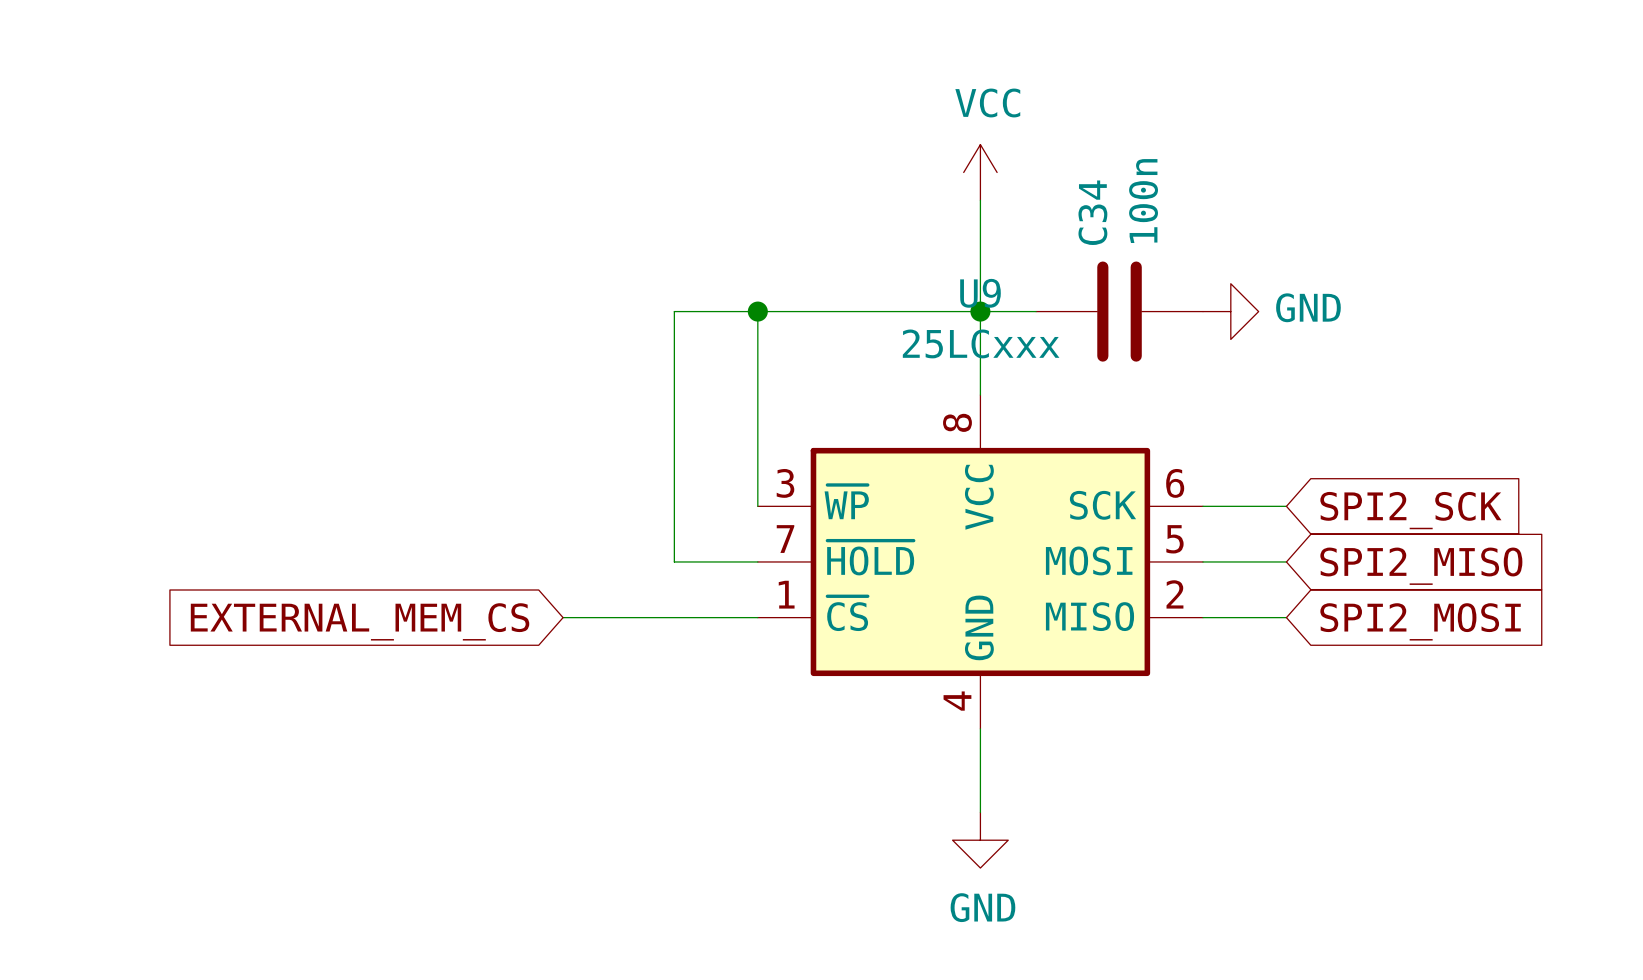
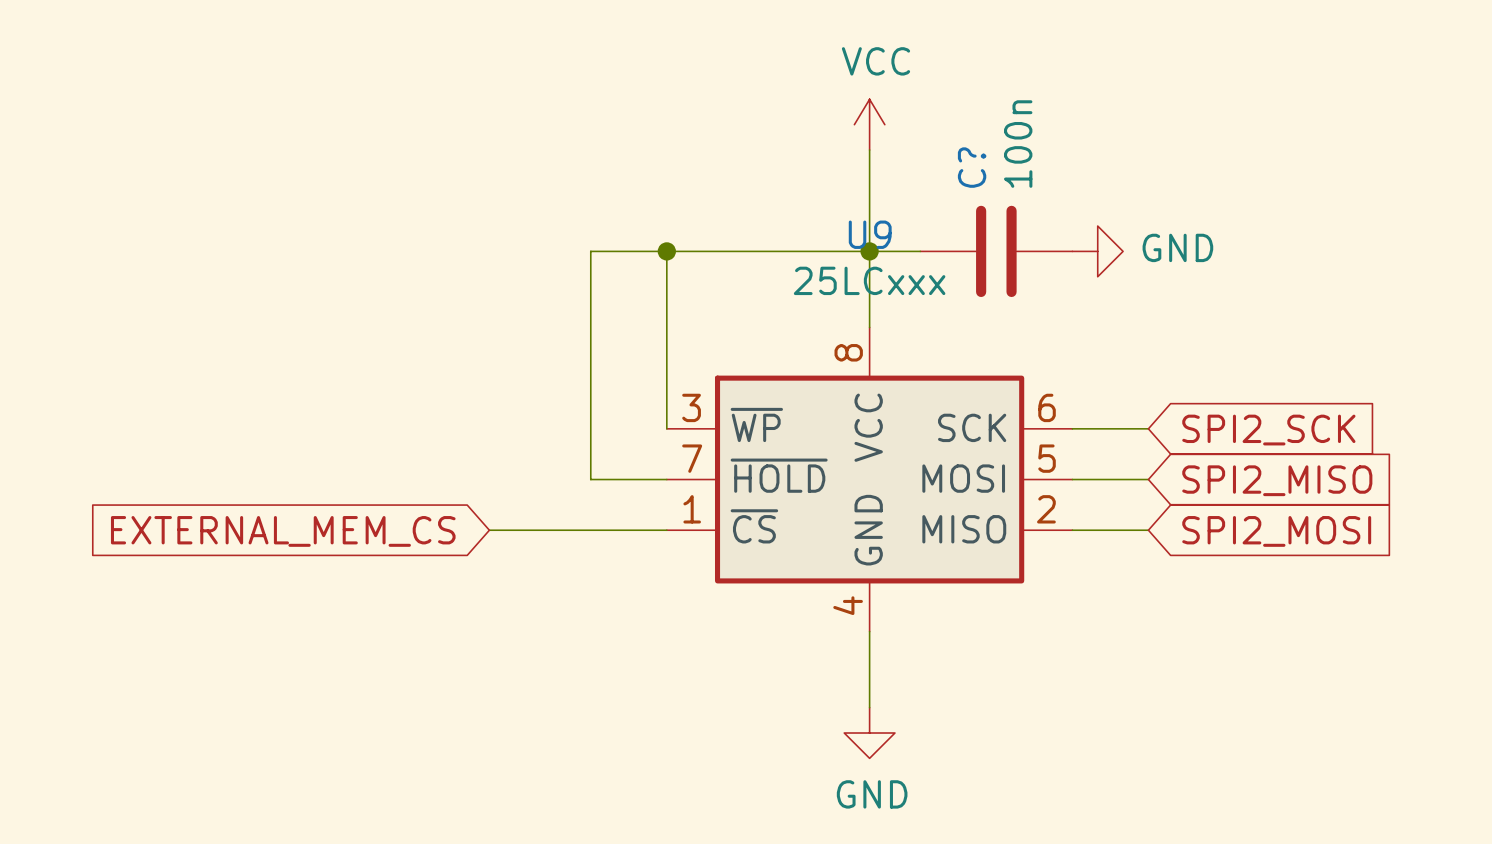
C34 name: C34 (1092, 212) -> C? (972, 167)

